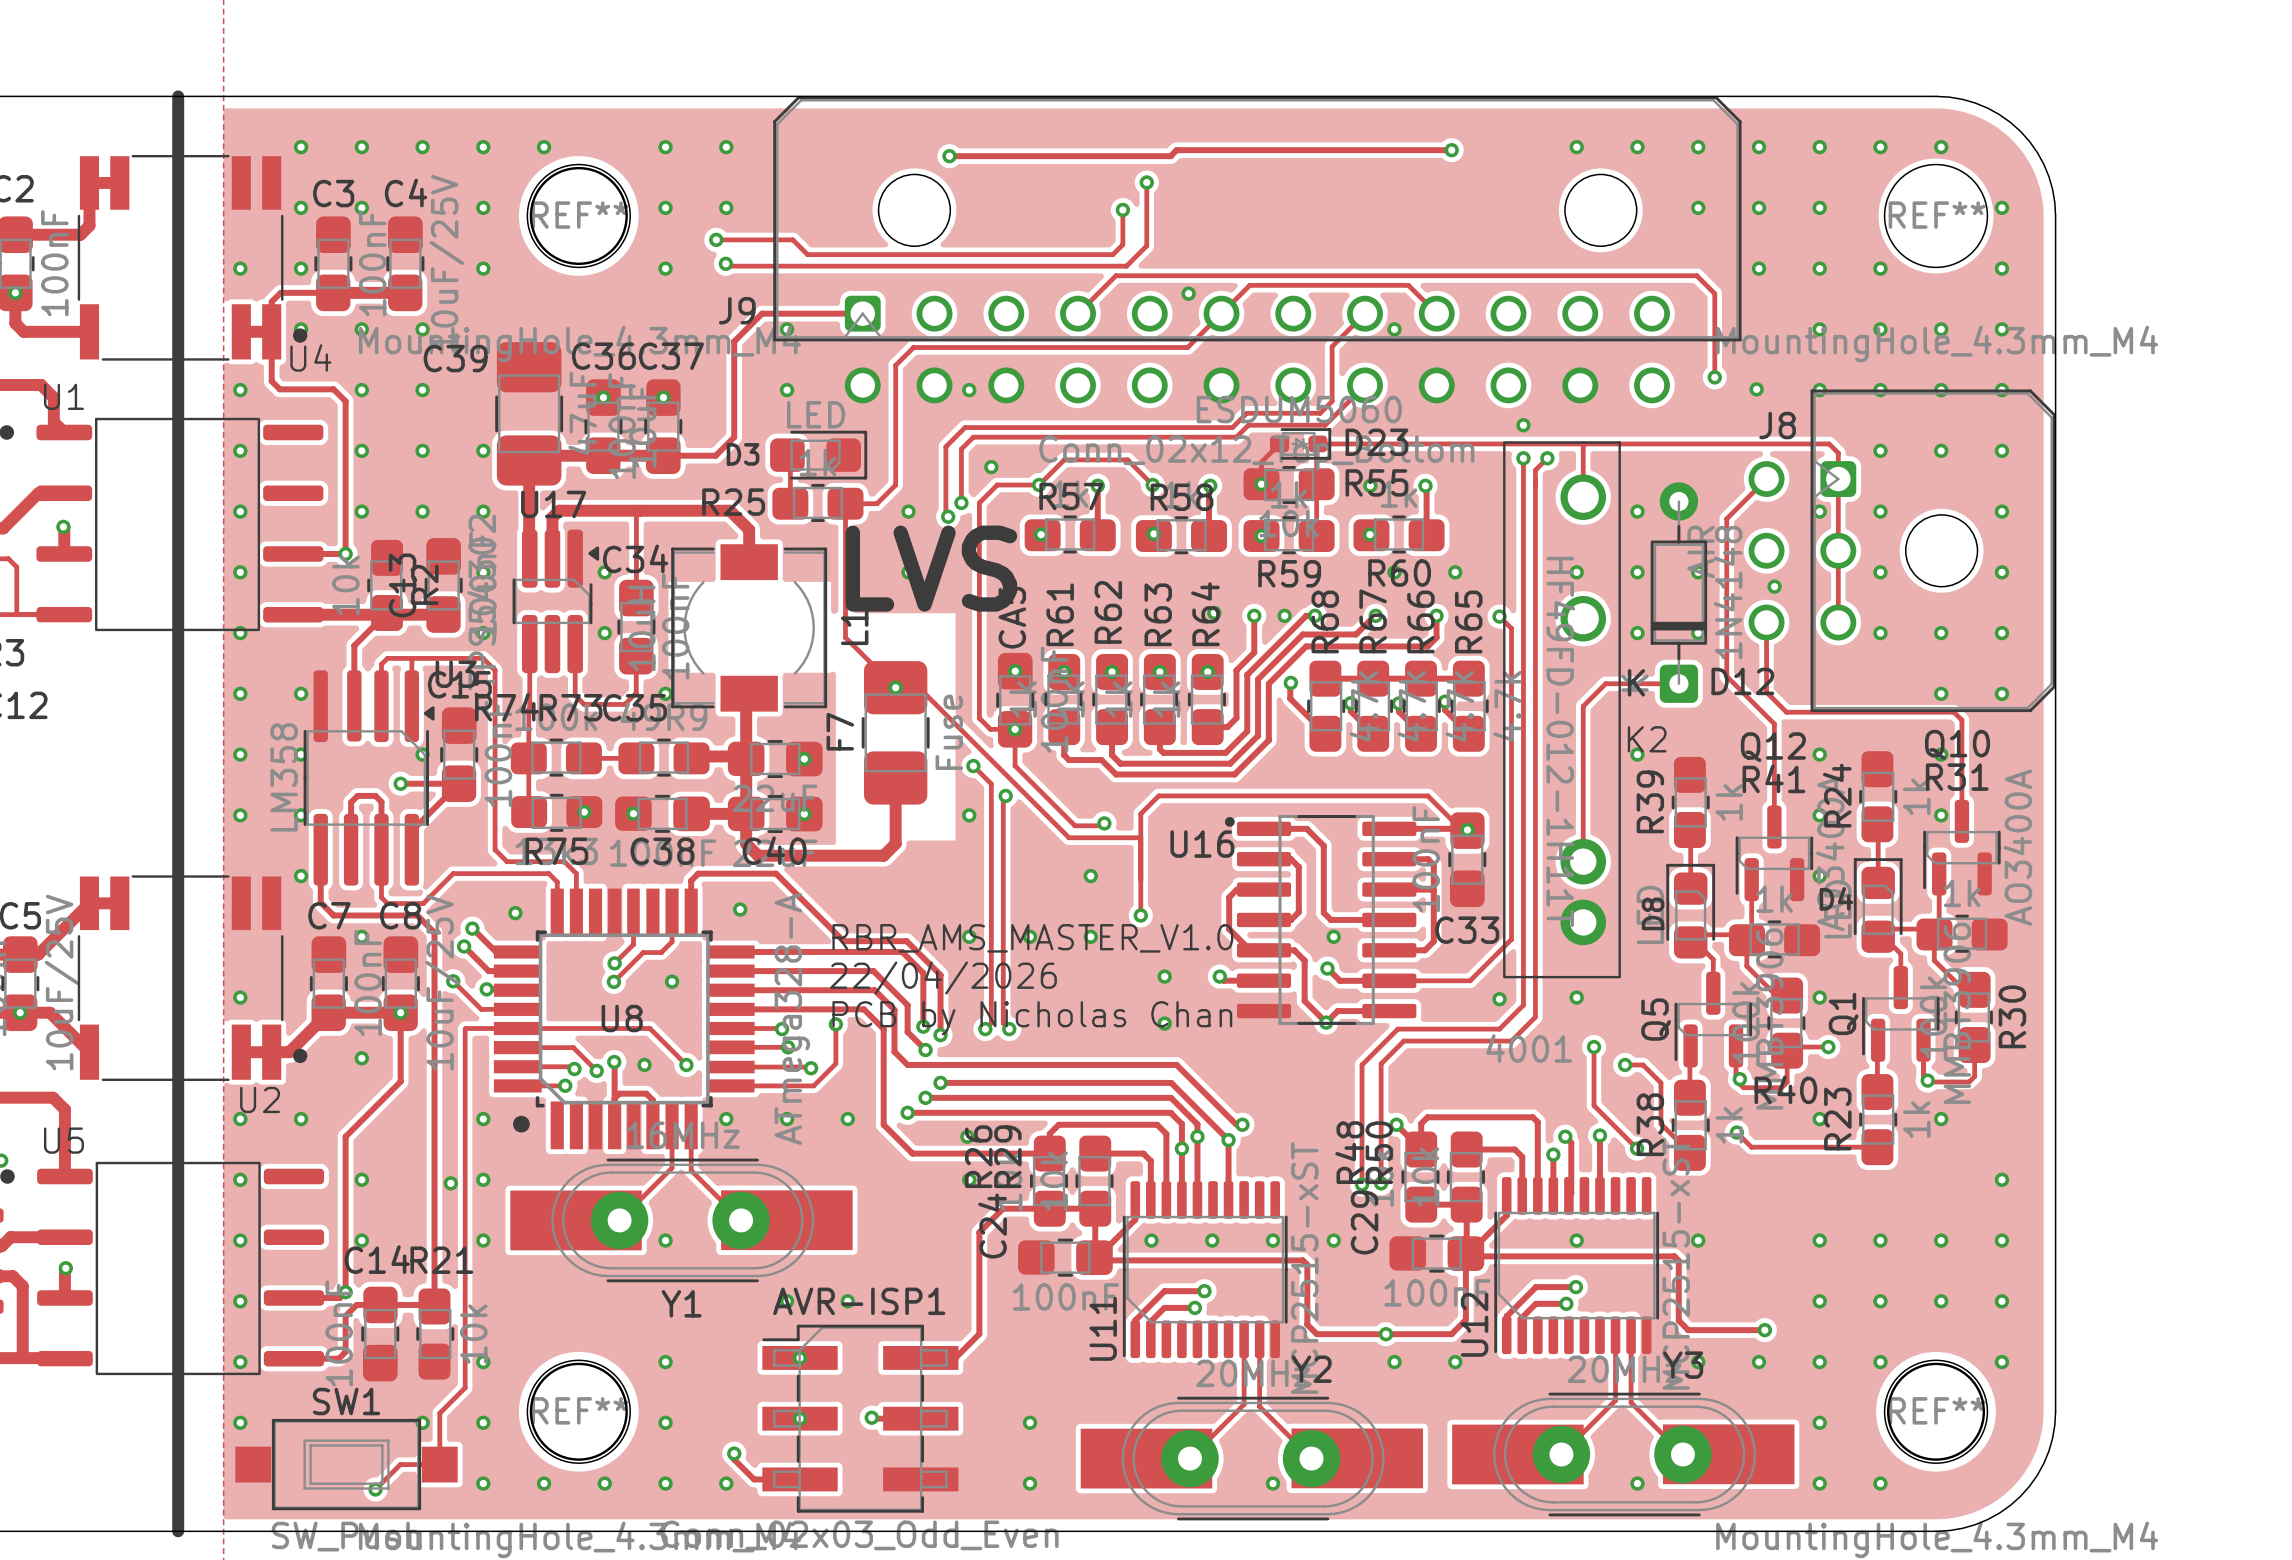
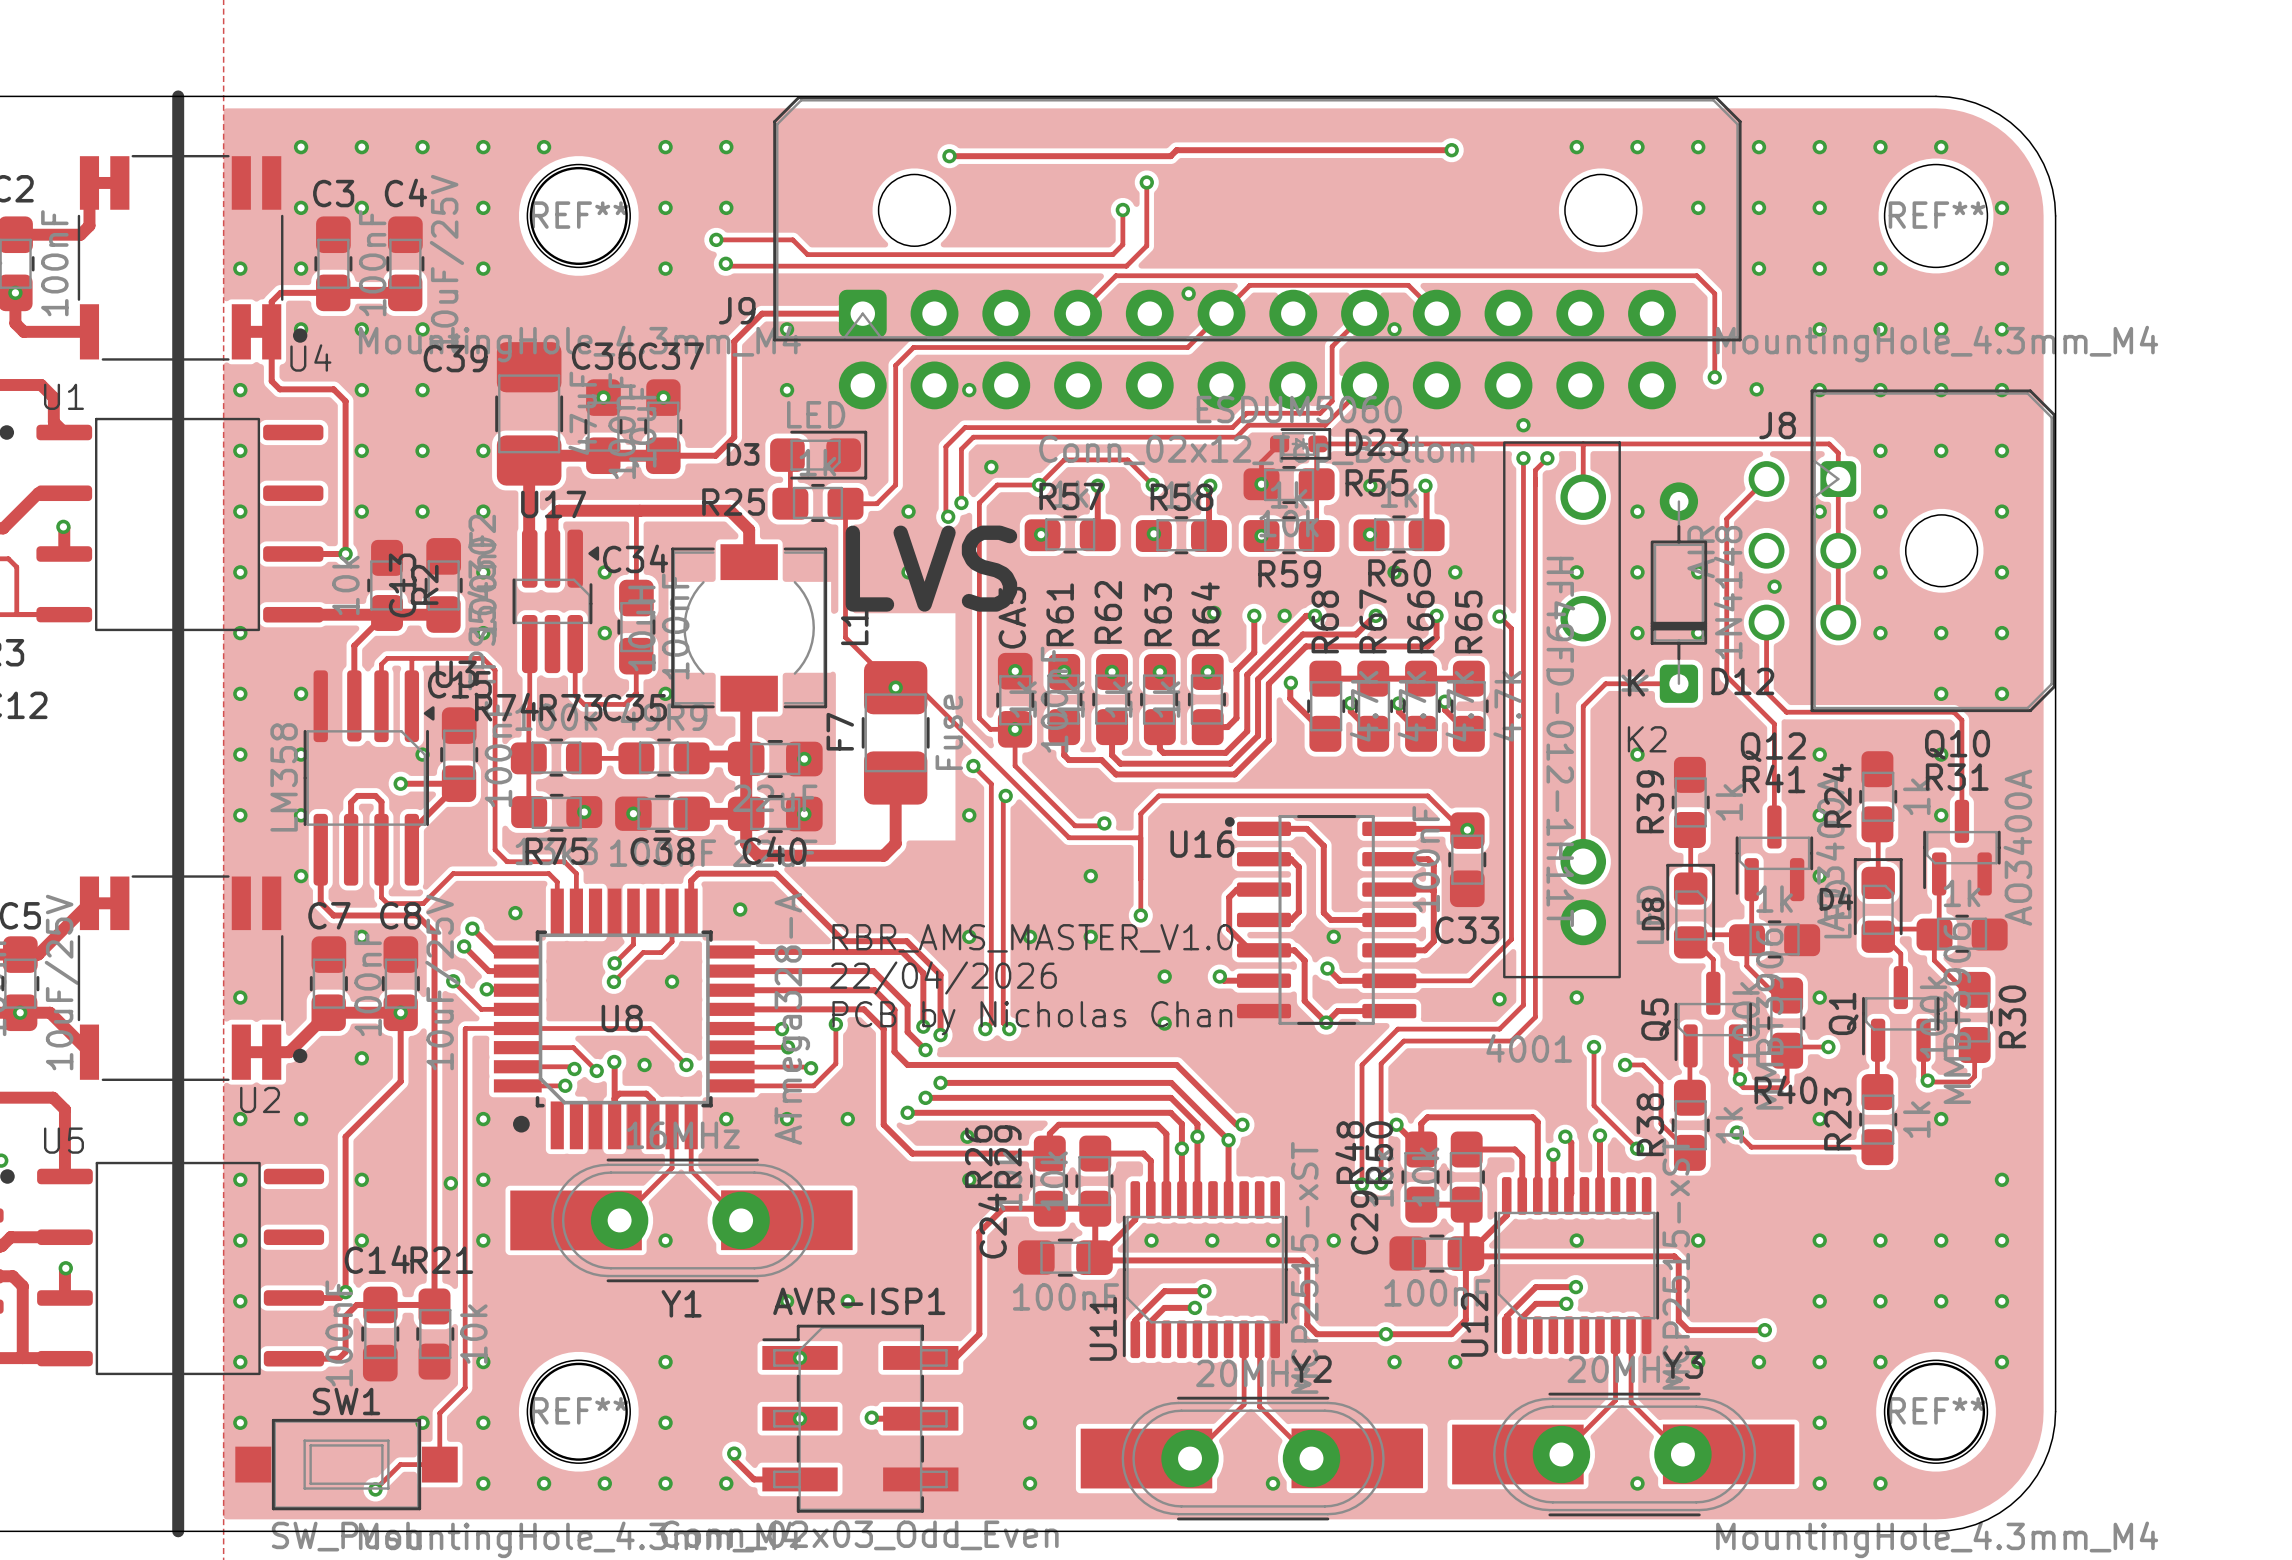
J9 footprint: [773, 96, 1742, 404] -> [773, 96, 1742, 410]

